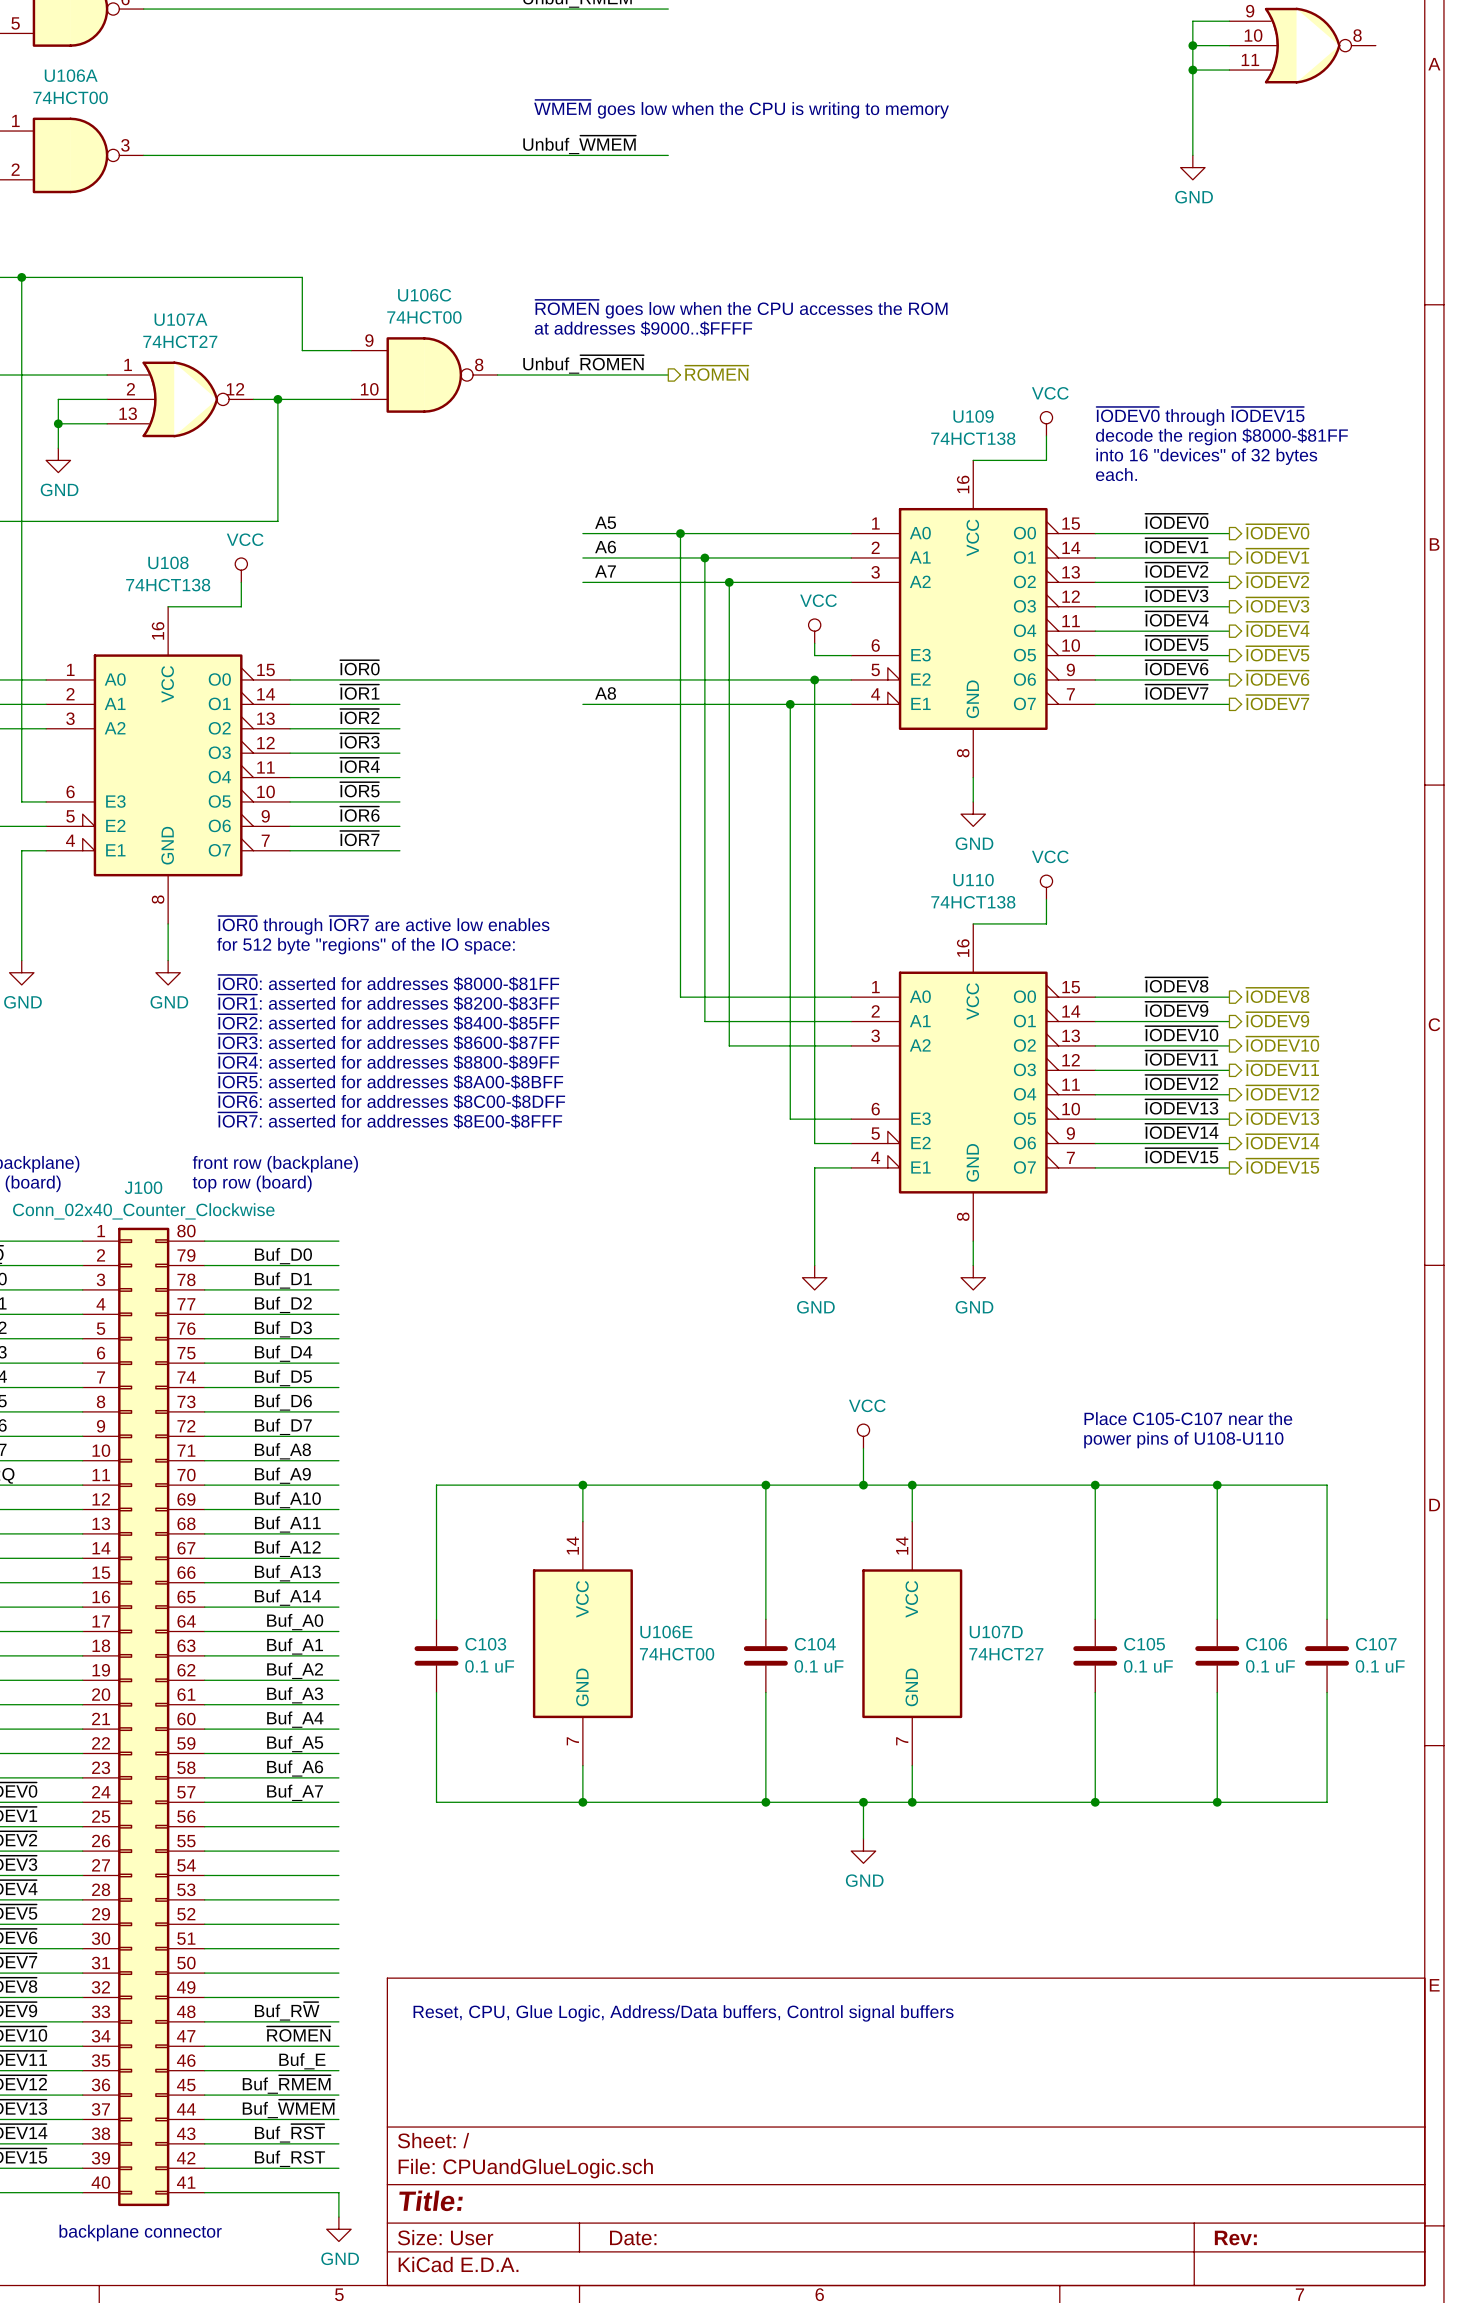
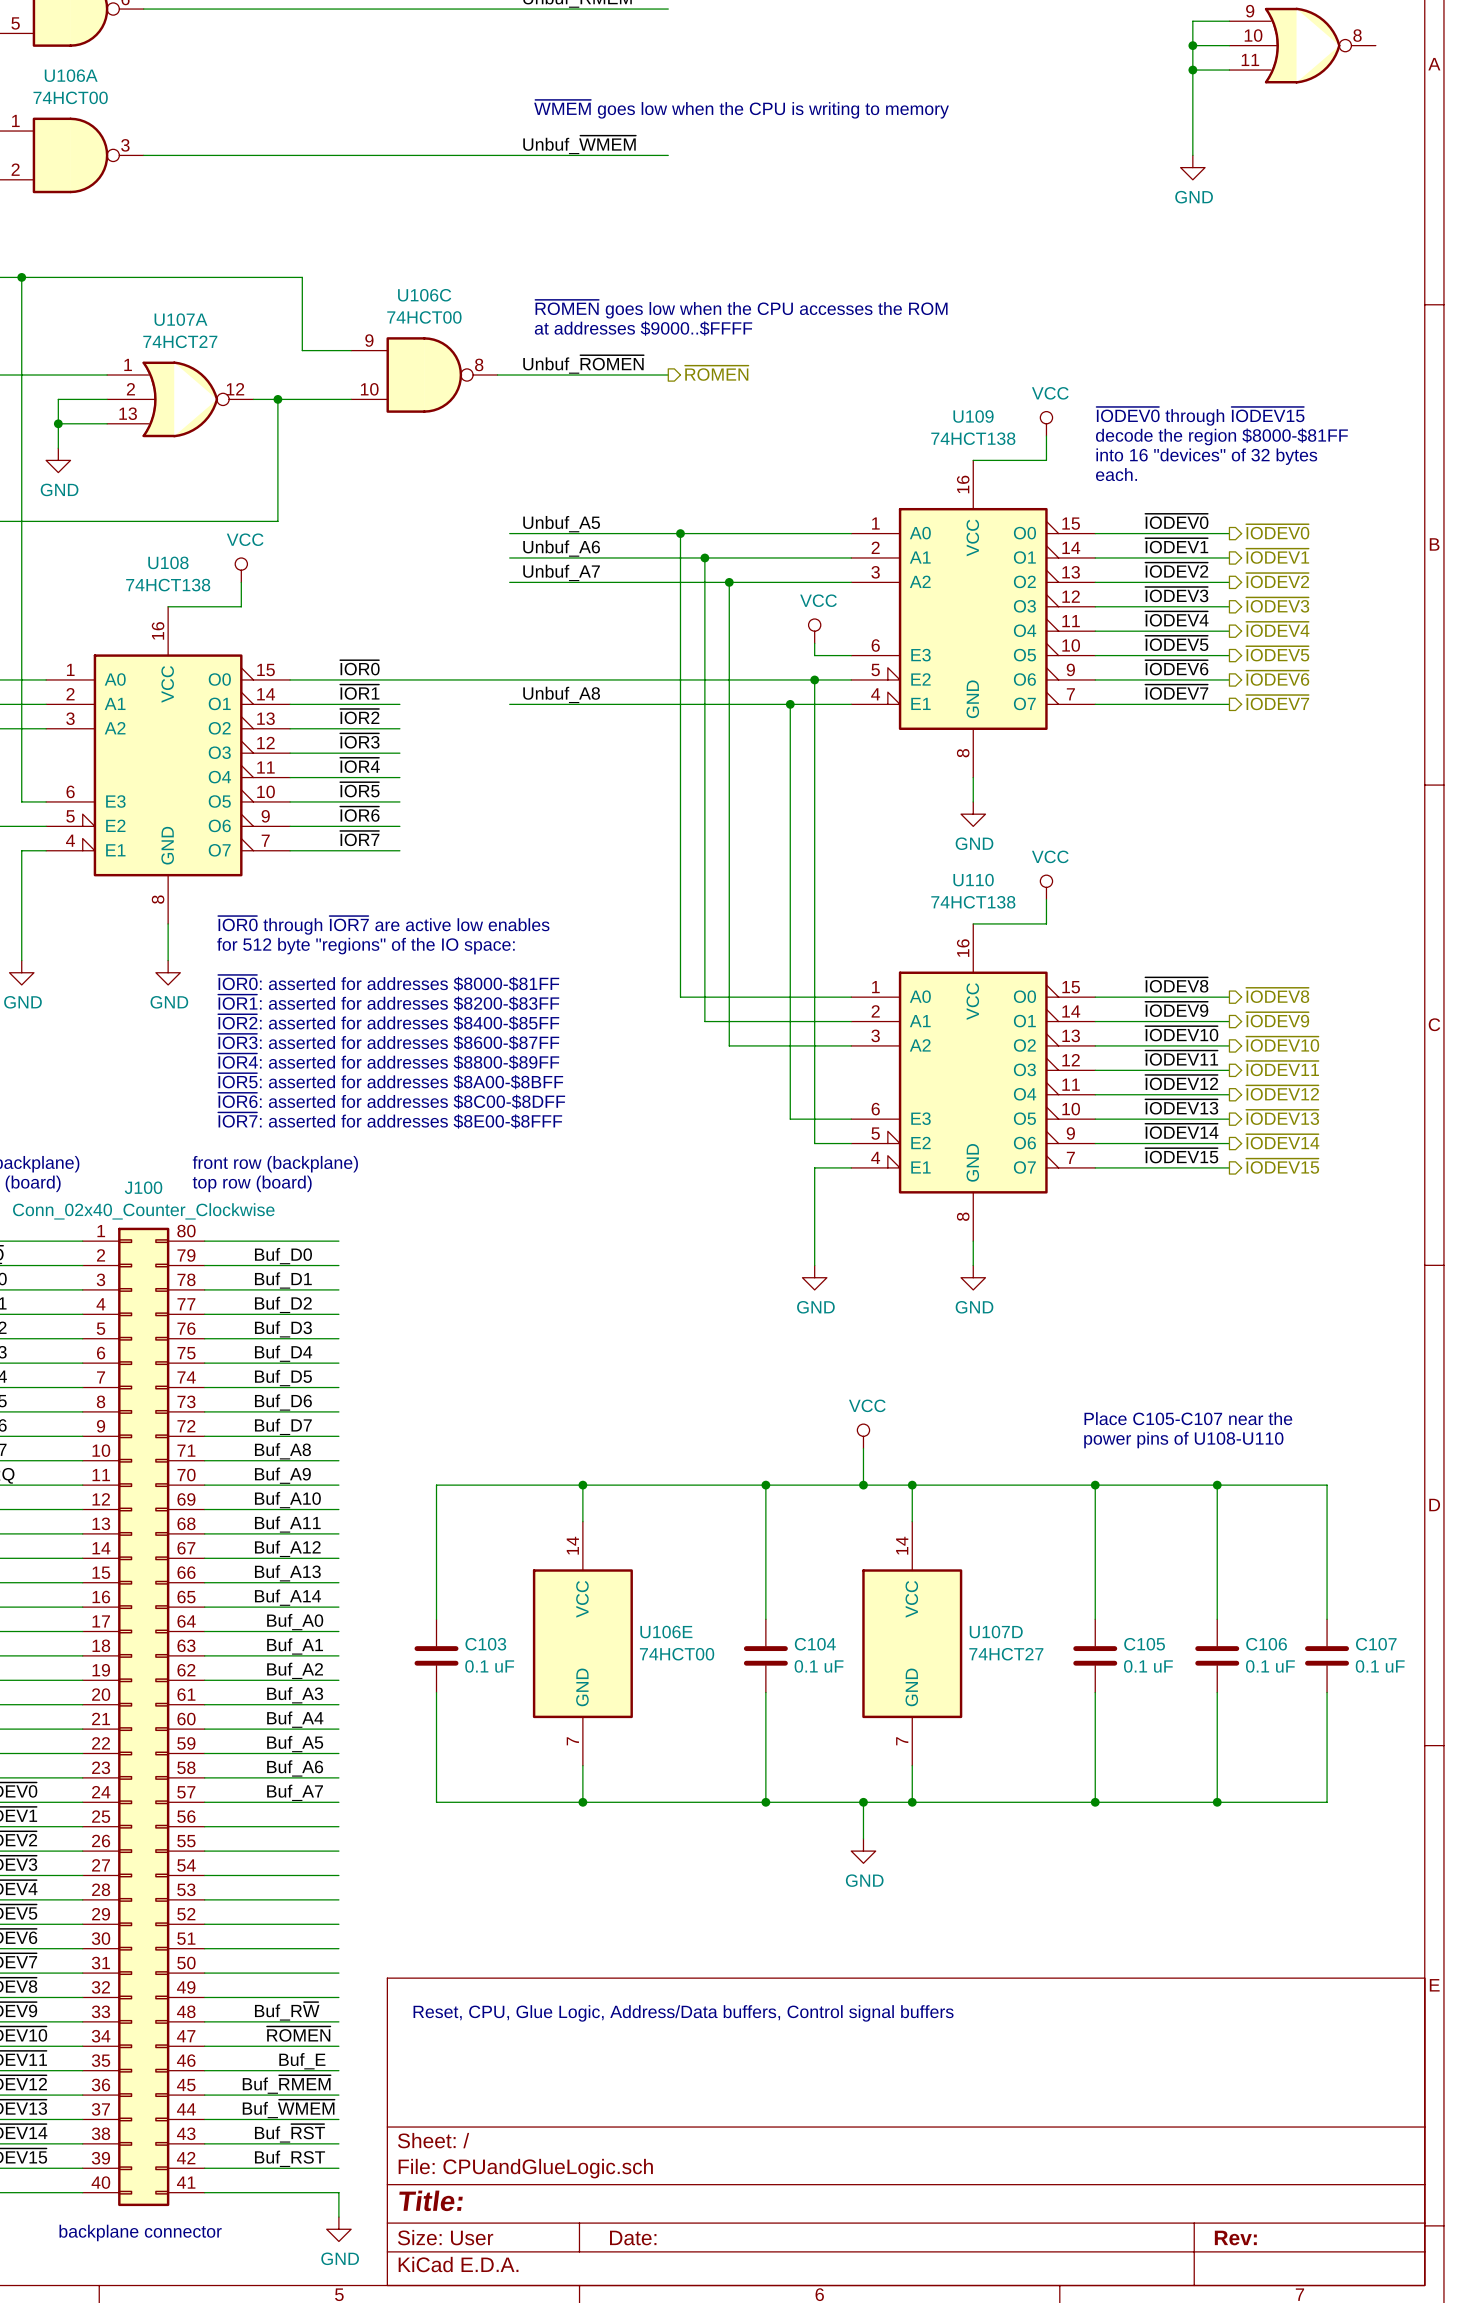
label: A5 (605, 522) -> none
label: none -> Unbuf_A5 (561, 524)
wire: none -> (509, 533) (582, 533)
label: A6 (605, 547) -> none
label: none -> Unbuf_A6 (561, 548)
wire: none -> (509, 557) (582, 557)
label: A7 (605, 571) -> none
label: none -> Unbuf_A7 (561, 572)
wire: none -> (509, 582) (582, 582)
label: A8 (605, 693) -> none
label: none -> Unbuf_A8 (561, 694)
wire: none -> (509, 704) (582, 704)

